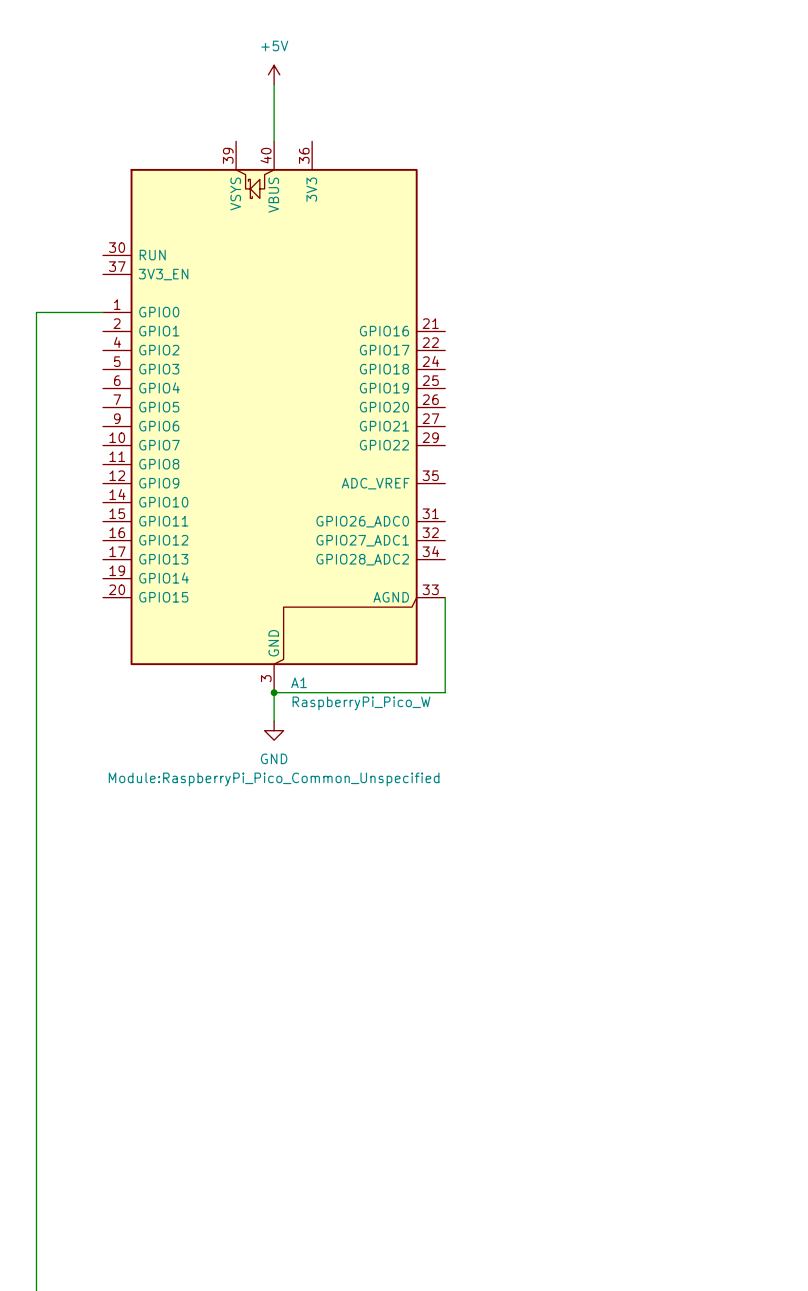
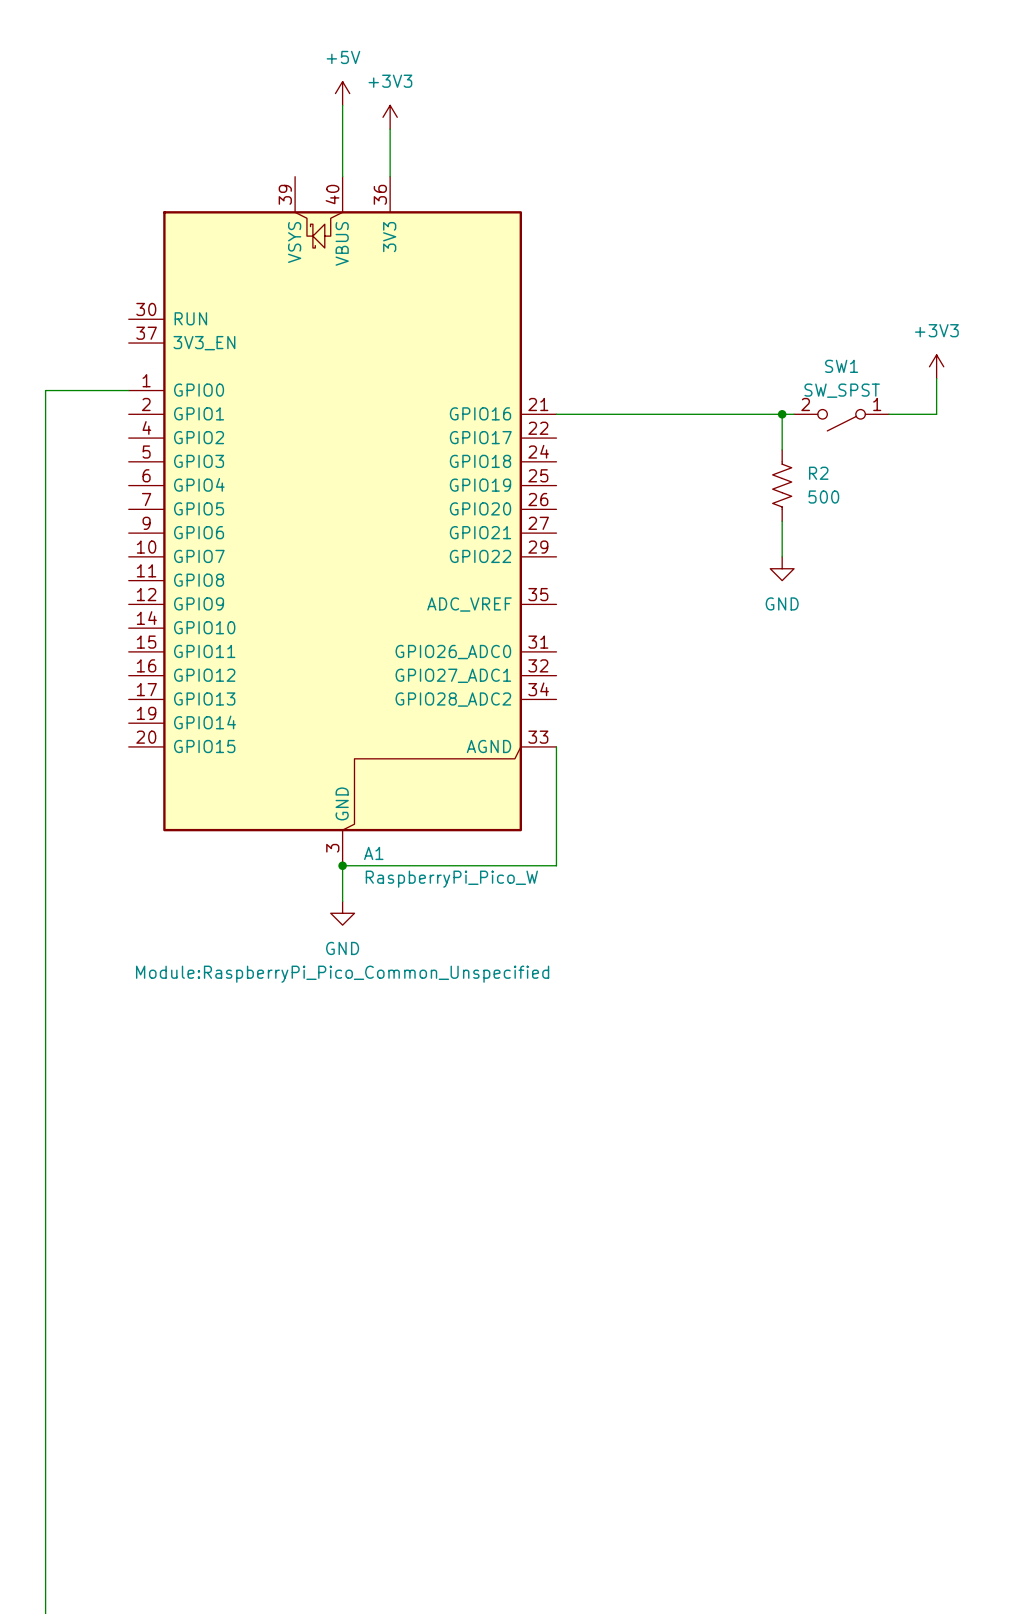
power symbol: none -> +3V3 (390, 117)
wire: none -> (390, 129) (390, 176)
power symbol: none -> +3V3 (936, 366)
wire: none -> (936, 378) (936, 414) (889, 414)
wire: none -> (556, 414) (794, 414)
wire: none -> (782, 414) (782, 449)
junction: none -> (782, 414)
SW1: none -> SW_SPST (841, 420)
R2: none -> 500 (782, 485)
wire: none -> (782, 521) (782, 556)
power symbol: none -> GND (782, 568)

